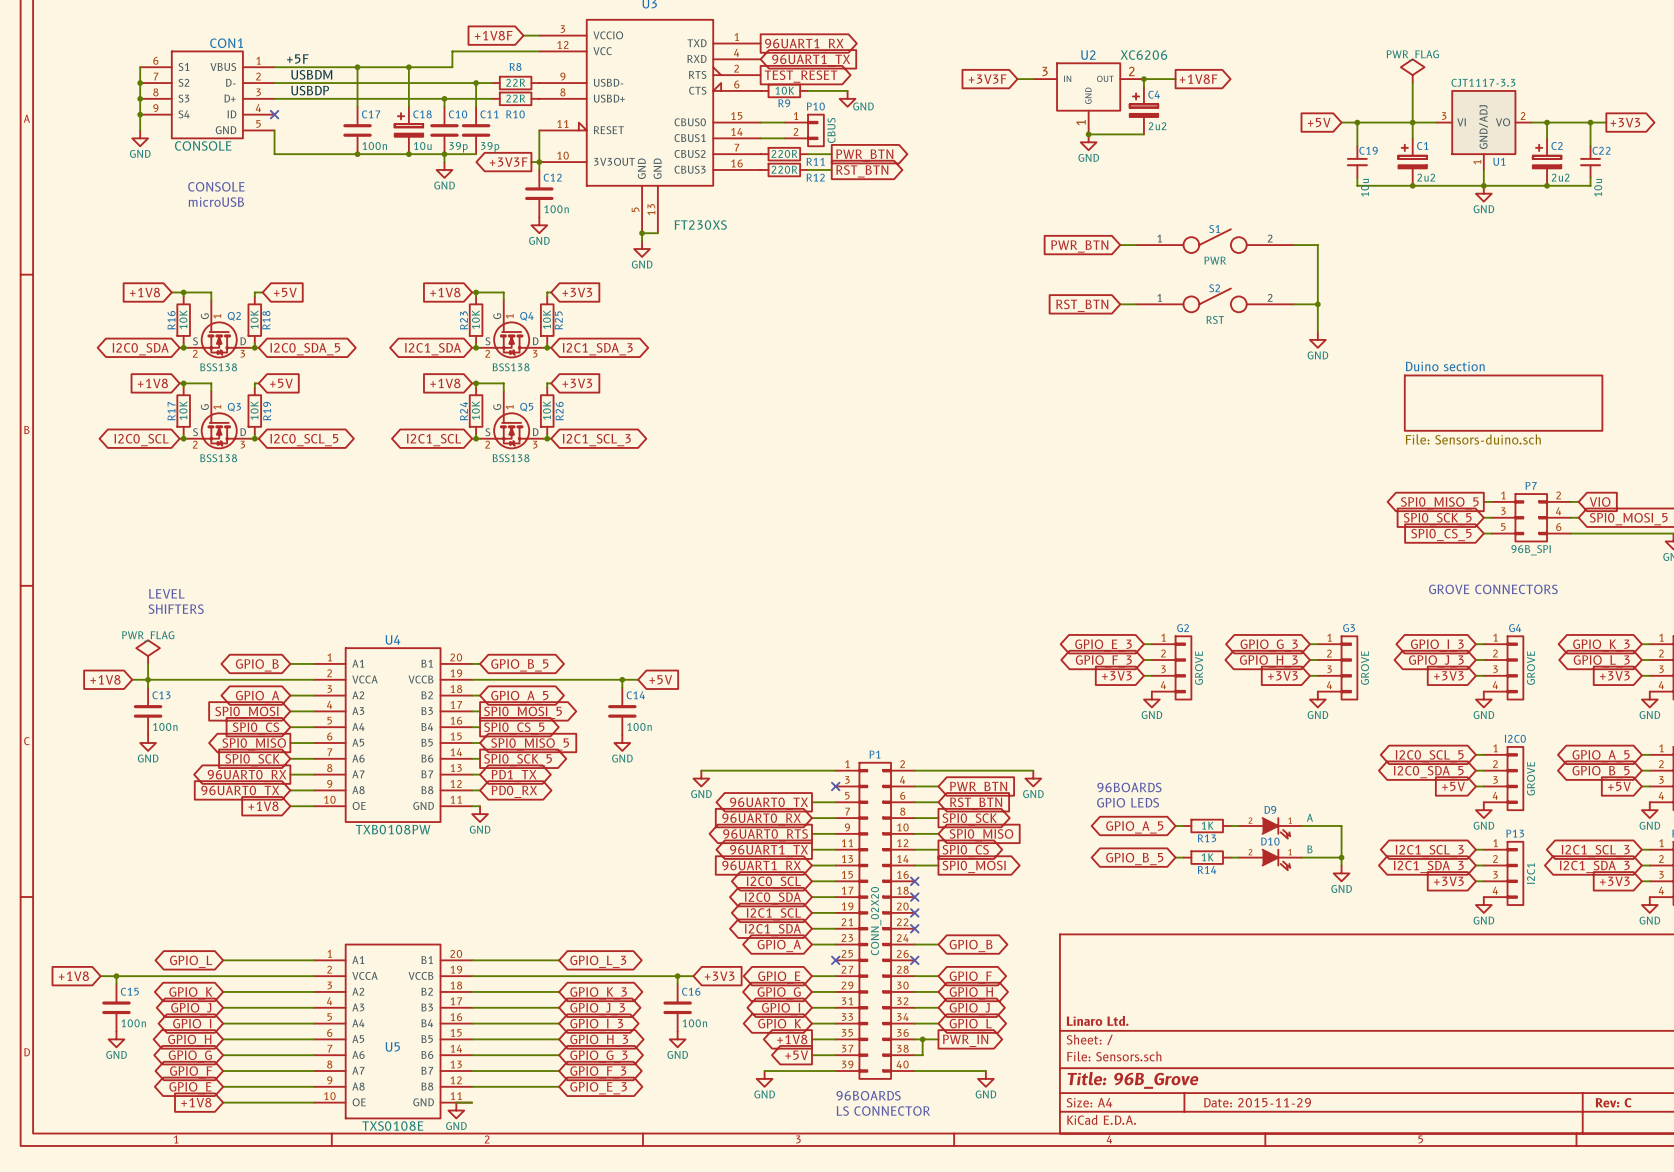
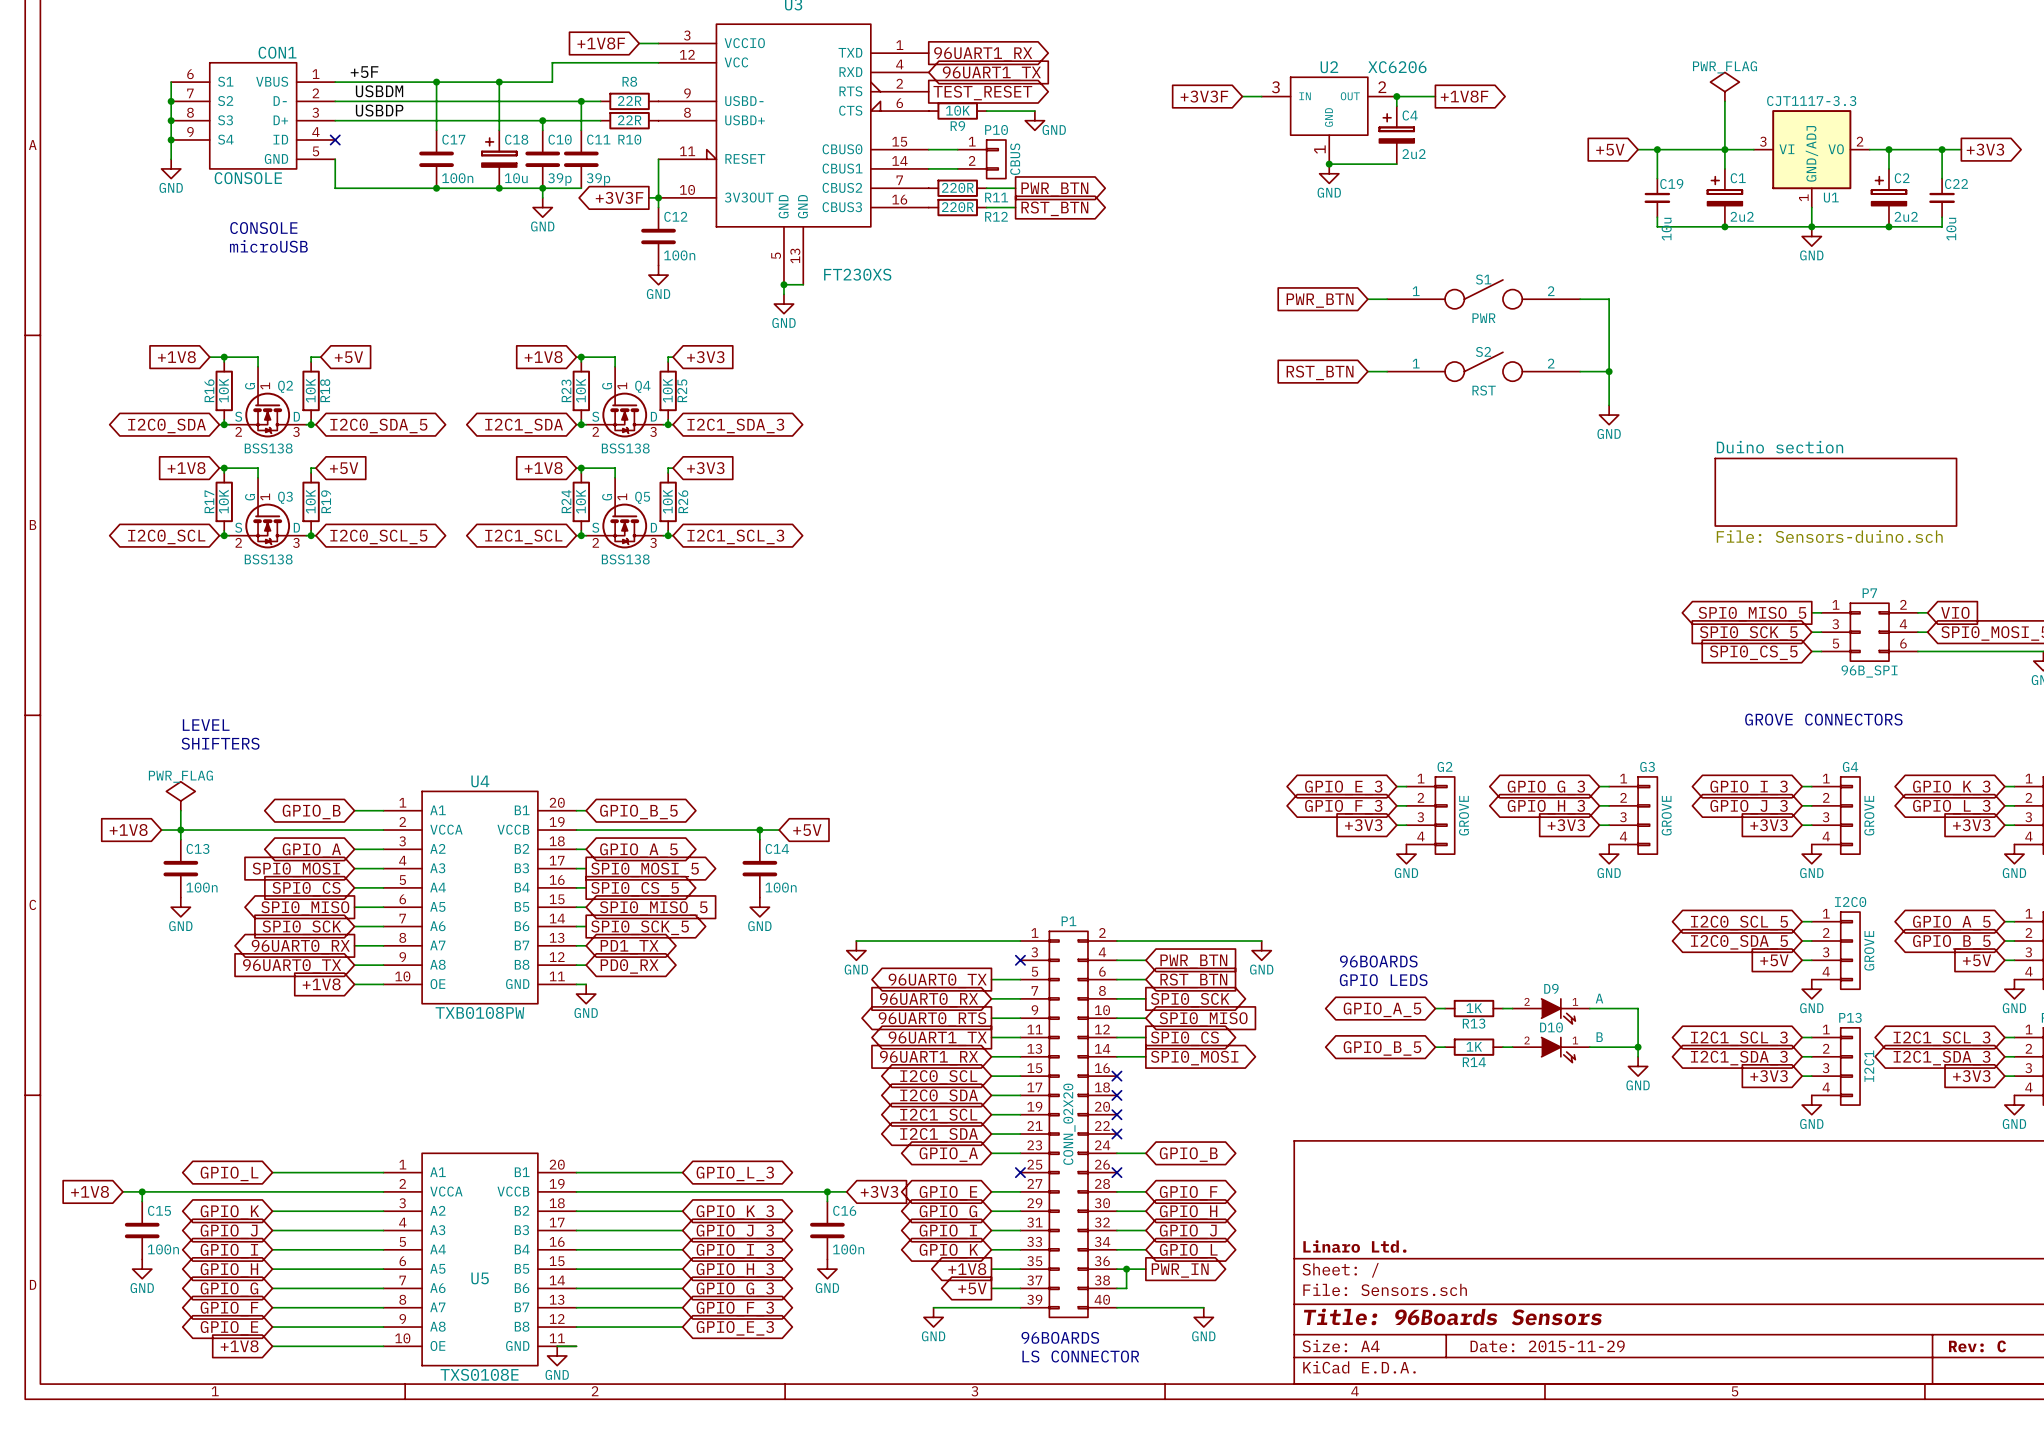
title block: Title: 96B_Grove (1132, 1080) -> Title: 96Boards Sensors (1452, 1316)

